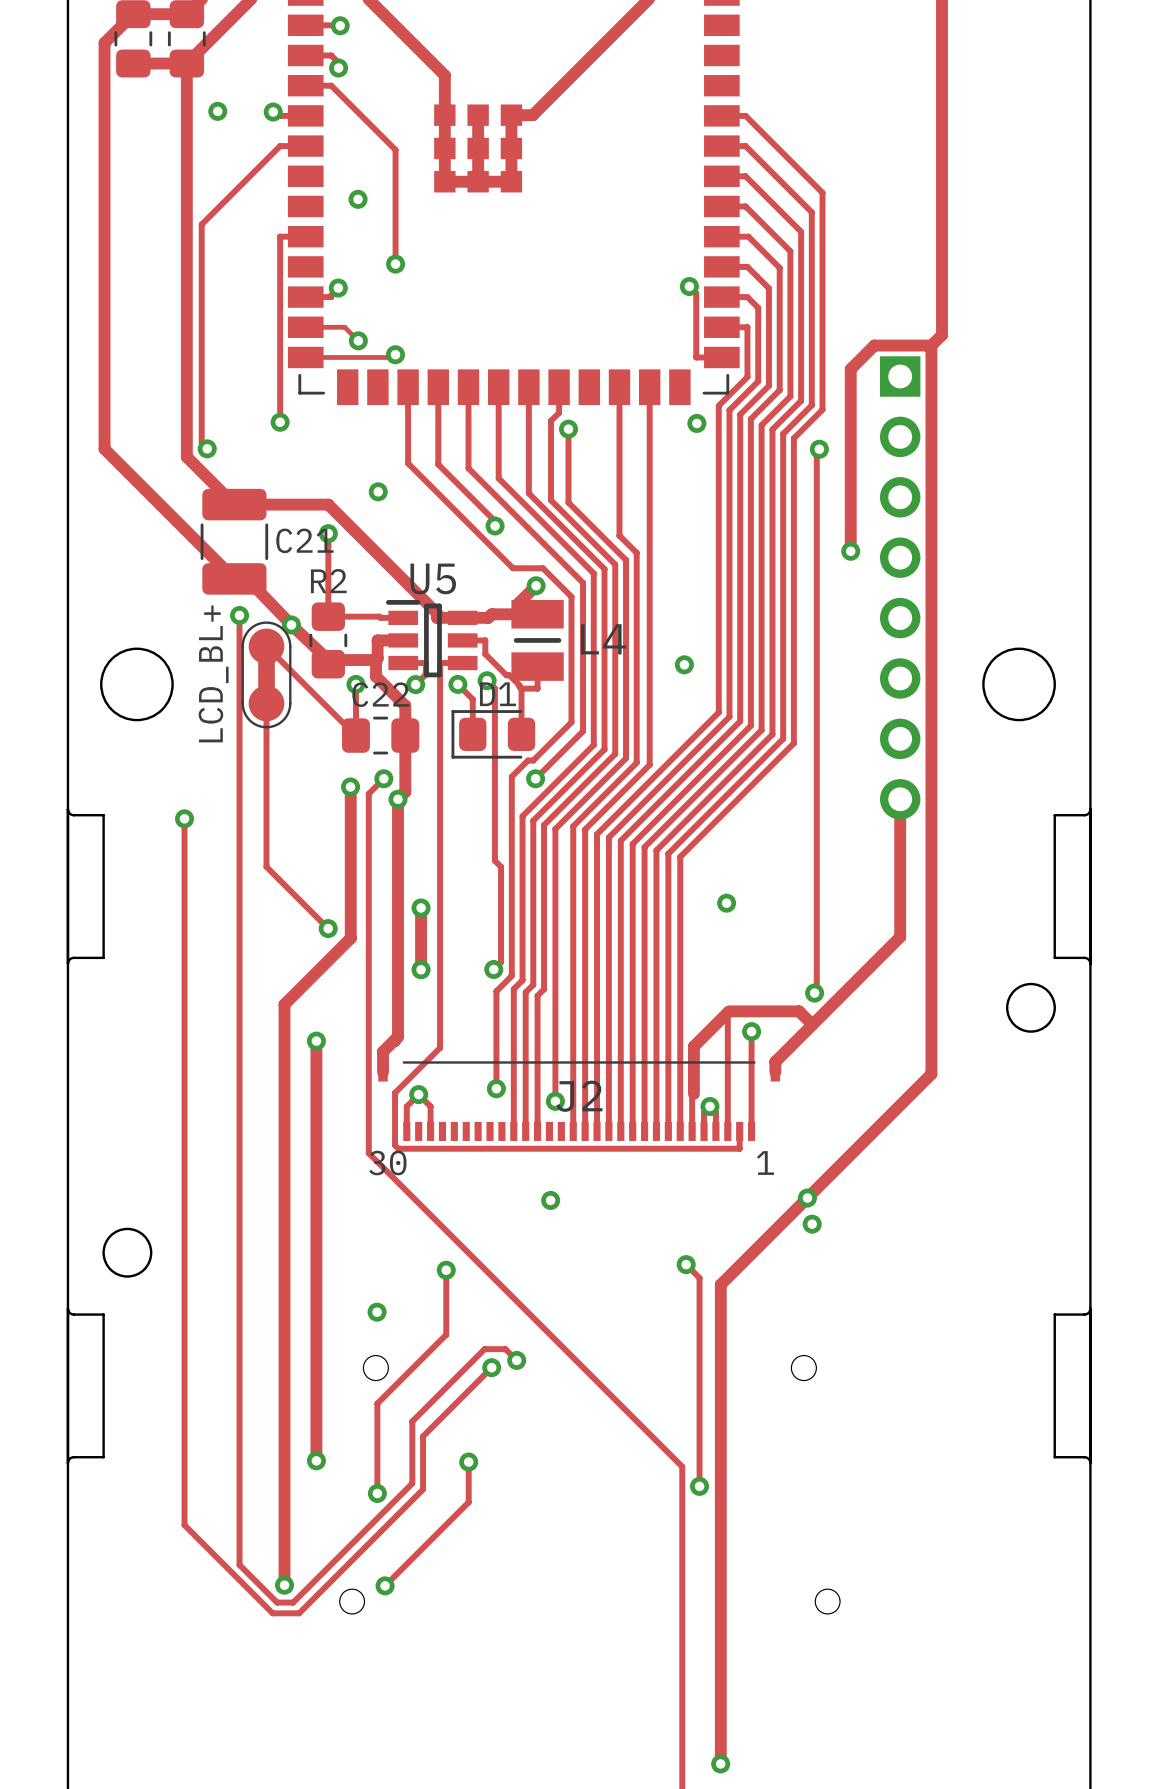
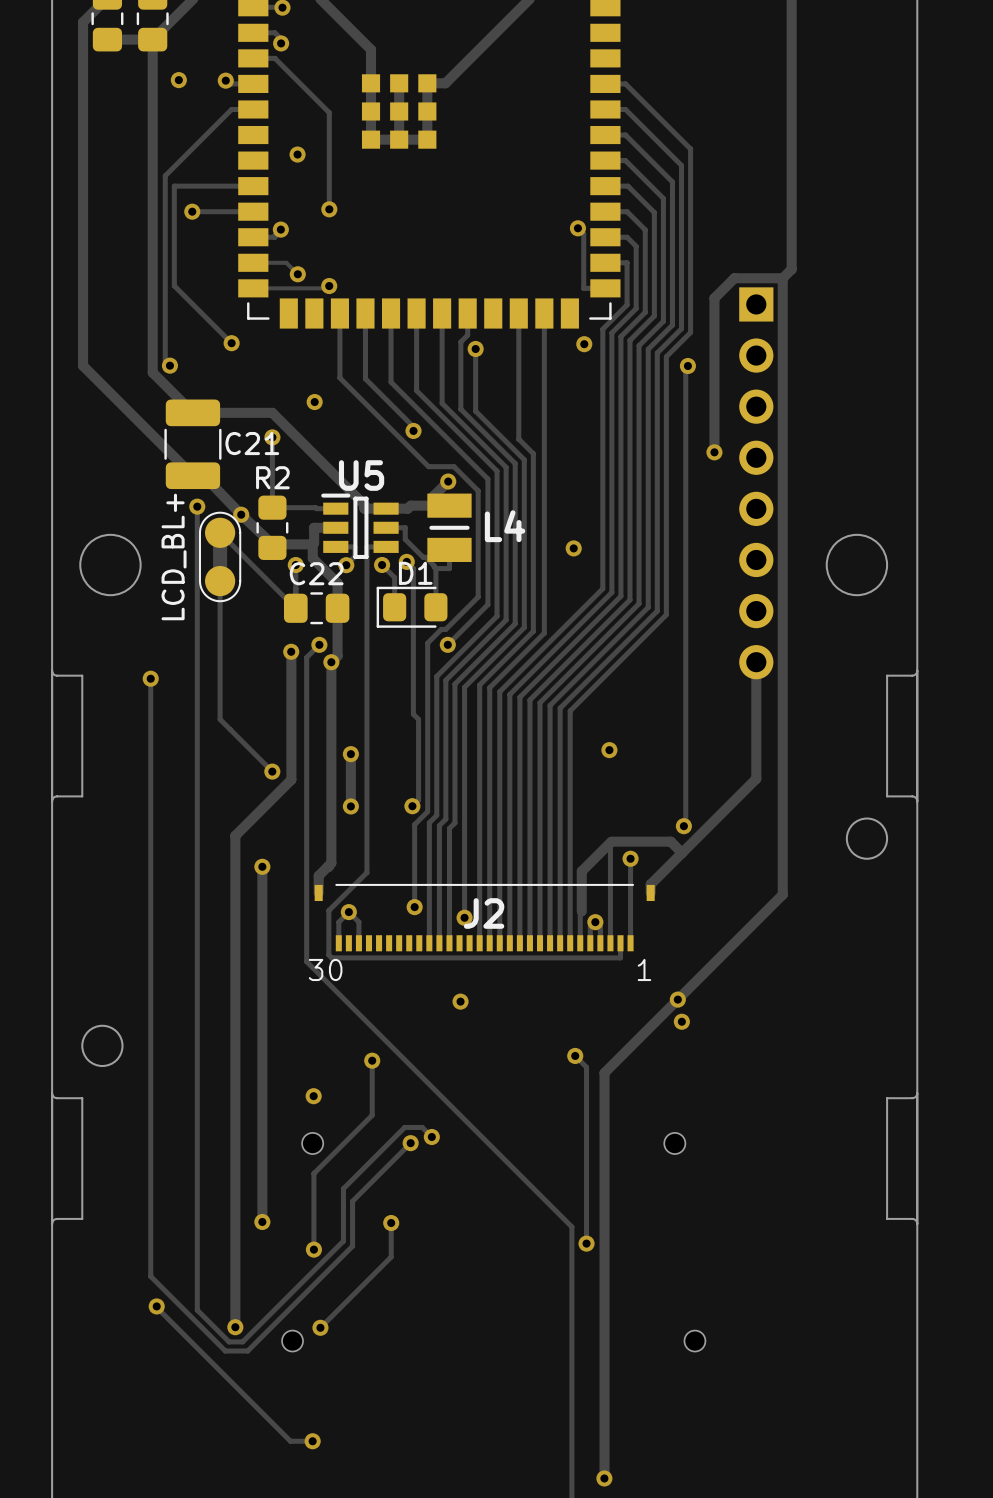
track: (280, 236) (280, 422) -> (231, 186) (174, 186) (174, 285) (231, 343)
track: none -> (192, 211) (253, 211)
via: none -> (192, 211)
track: none -> (156, 1306) (290, 1441) (312, 1441)
via: none -> (156, 1306)
via: none -> (312, 1441)

